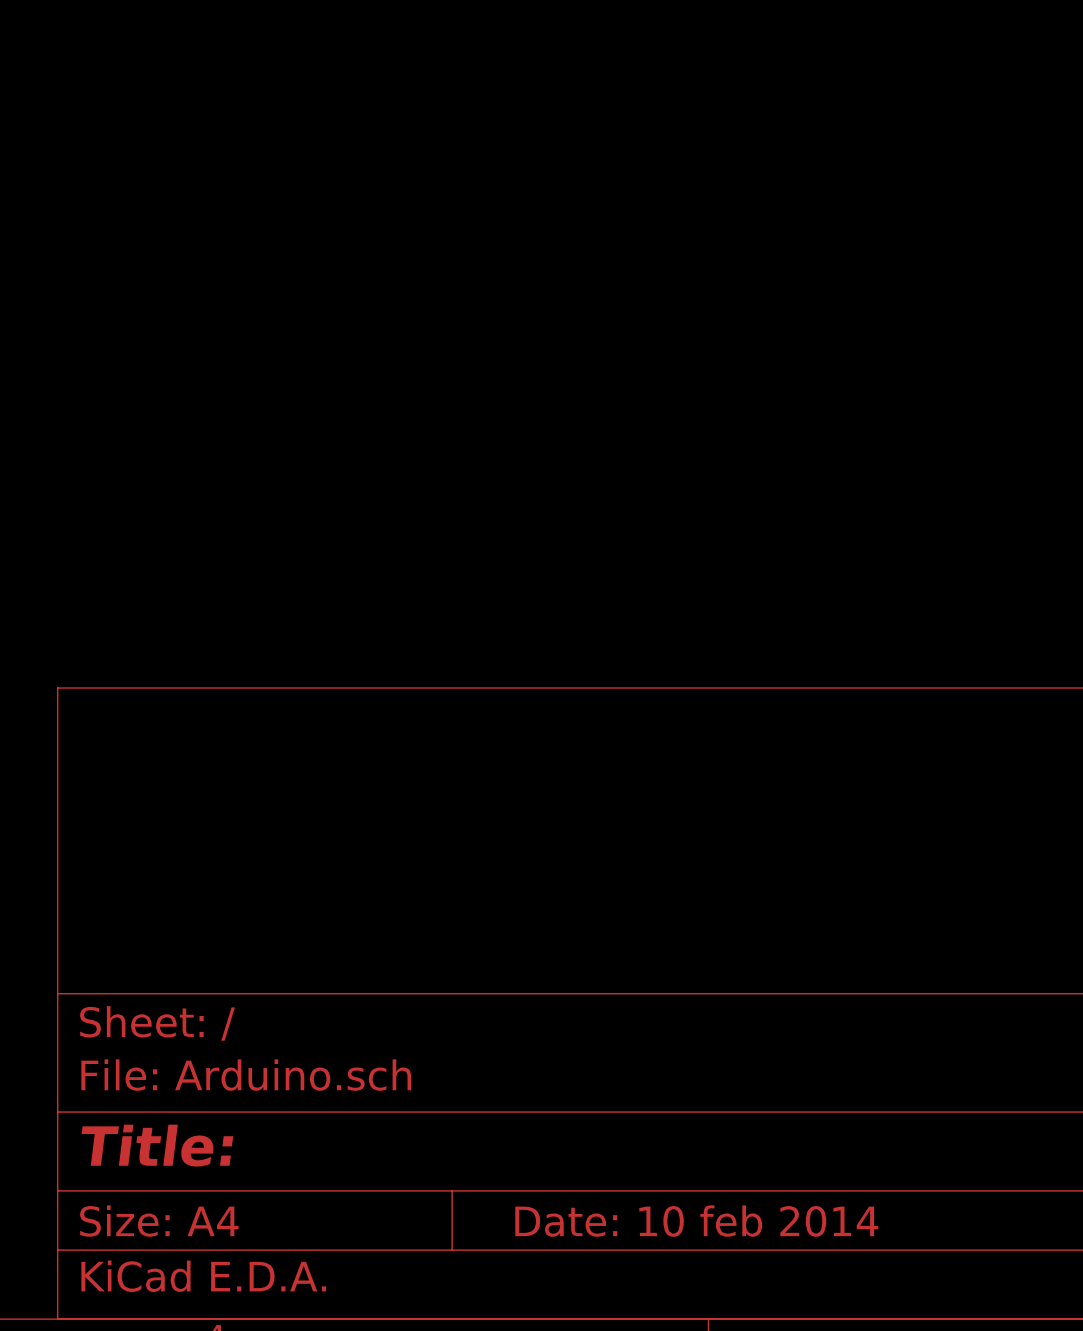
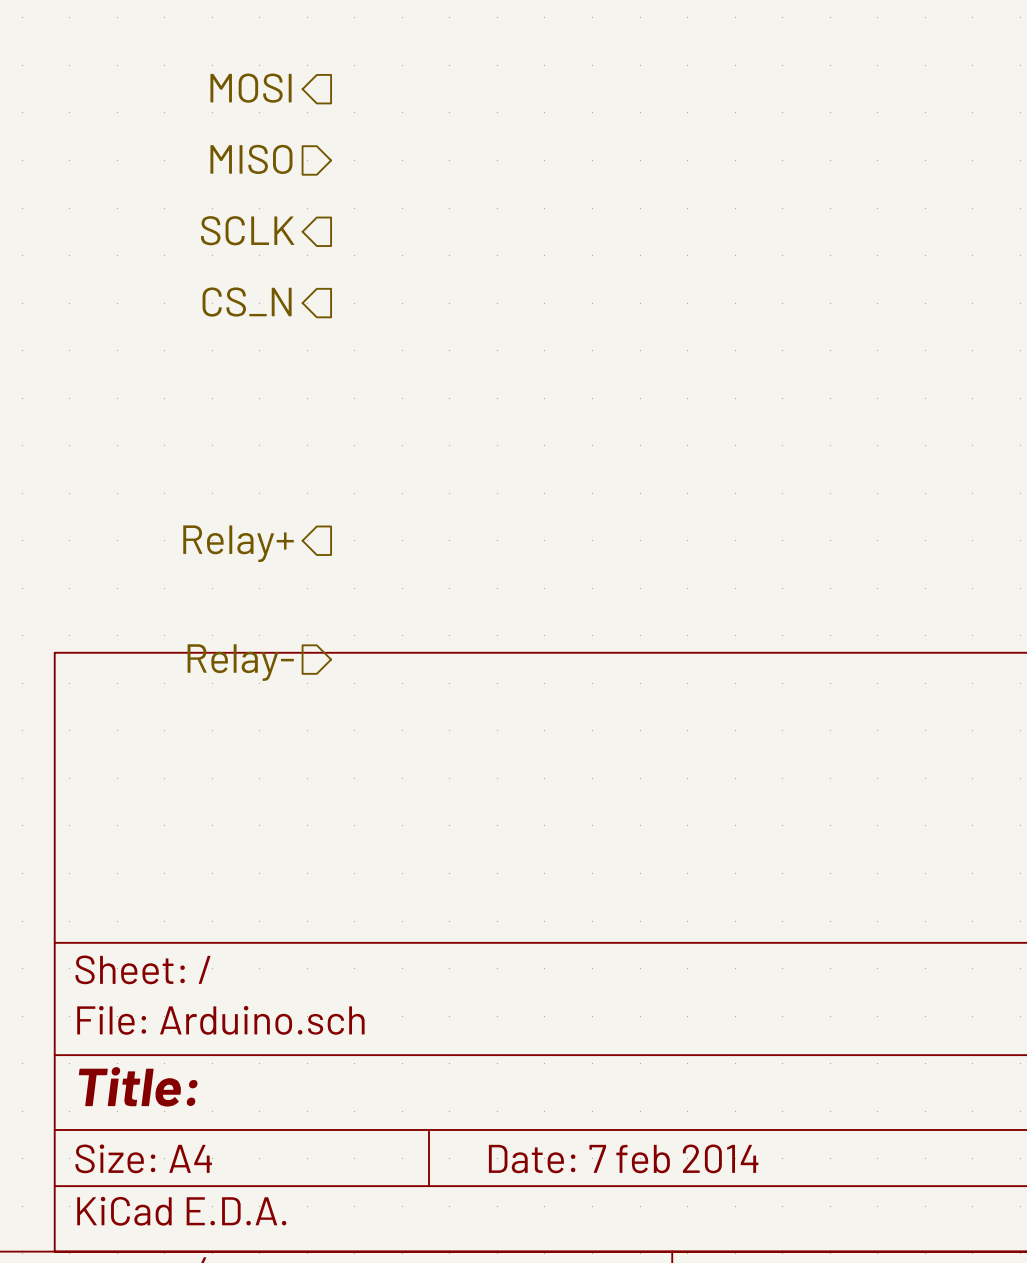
hierarchical label: none -> MOSI (251, 88)
hierarchical label: none -> MISO (251, 159)
hierarchical label: none -> SCLK (247, 230)
hierarchical label: none -> CS_N (247, 302)
hierarchical label: none -> Relay+ (238, 543)
hierarchical label: none -> Relay- (240, 662)
title block: Date: 10 feb 2014 (696, 1221) -> Date: 7 feb 2014 (623, 1158)

